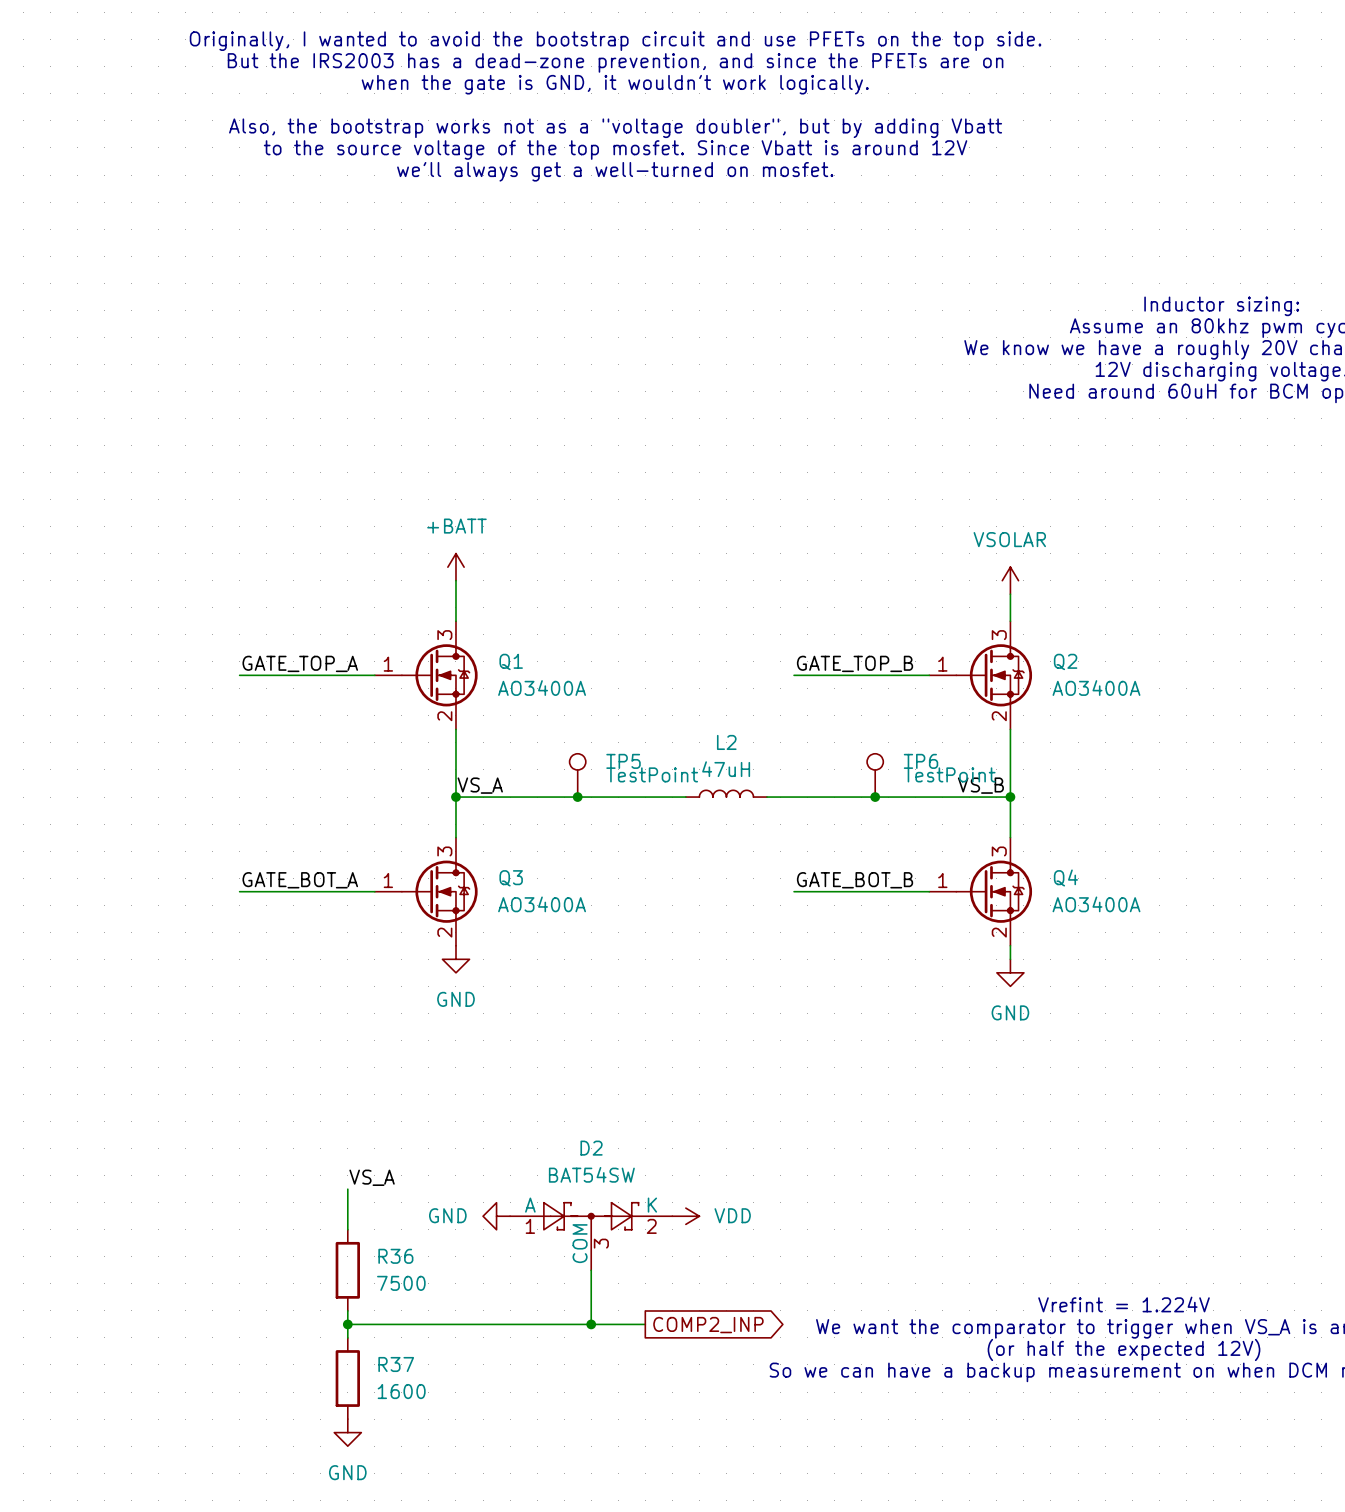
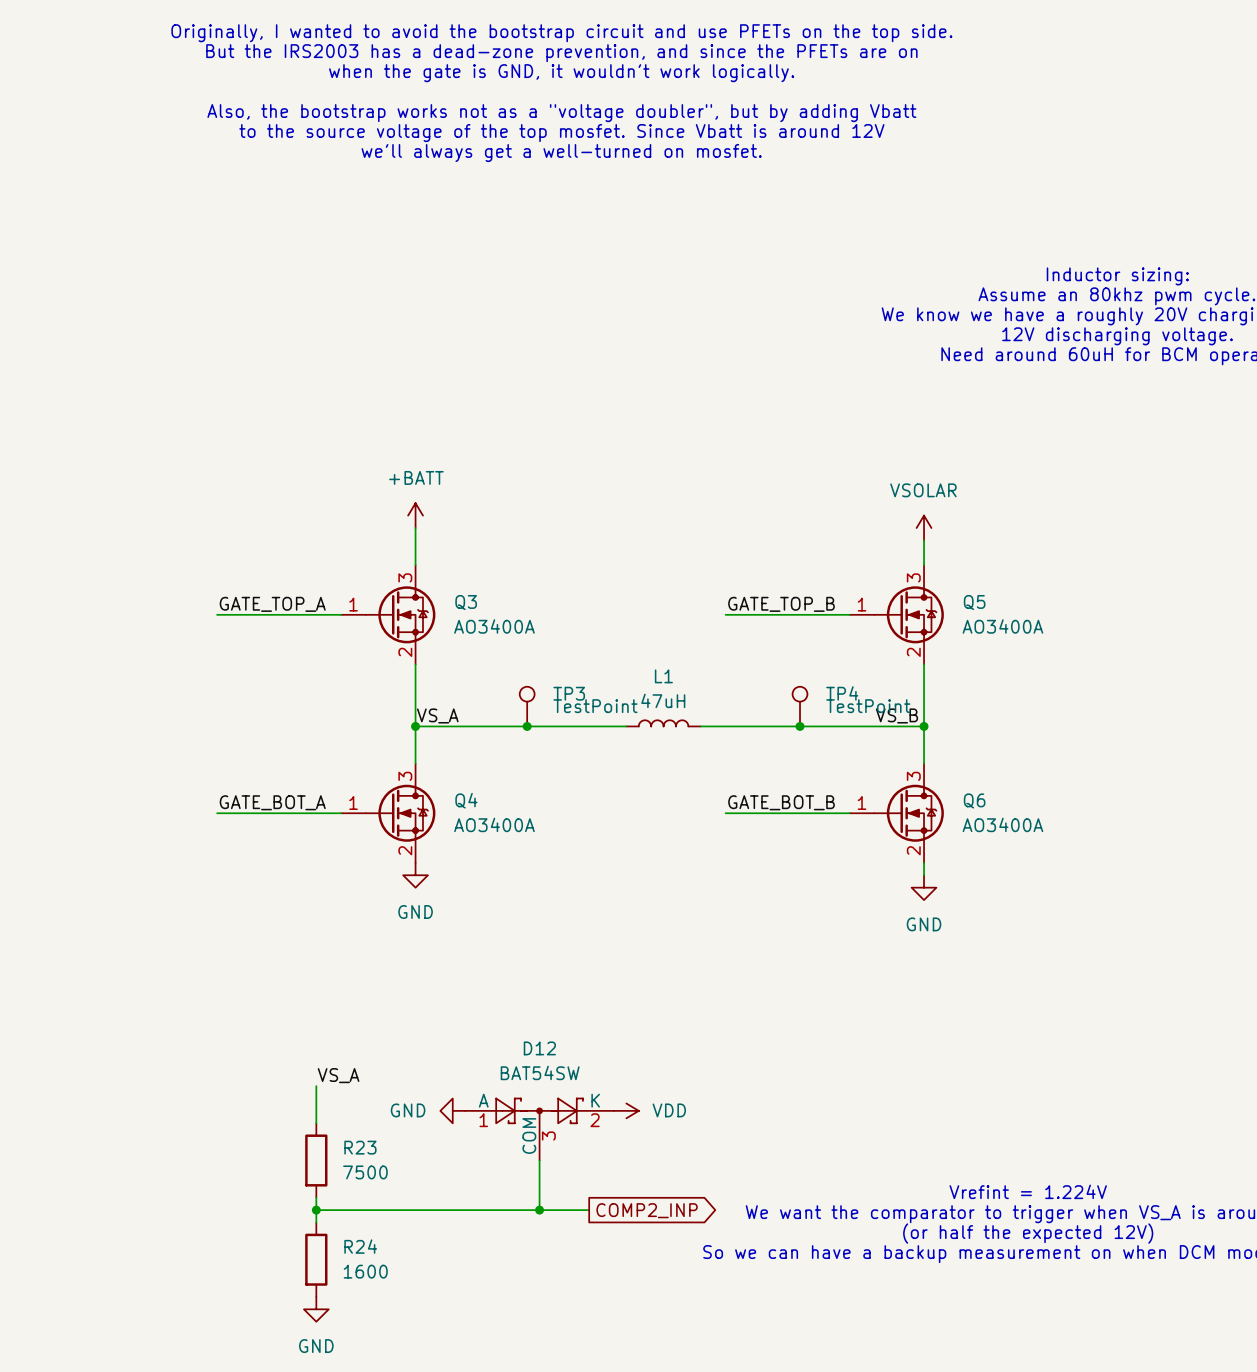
Q1 name: Q1 (511, 661) -> Q3 (466, 602)
Q2 name: Q2 (1065, 661) -> Q5 (974, 602)
L2 name: L2 (726, 742) -> L1 (663, 676)
TP5 name: TP5 (623, 761) -> TP3 (569, 693)
TP6 name: TP6 (921, 761) -> TP4 (842, 693)
Q4 name: Q4 (1065, 877) -> Q6 (974, 800)
Q3 name: Q3 (511, 878) -> Q4 (466, 800)
D2 name: D2 (591, 1148) -> D12 (539, 1048)
R36 name: R36 (395, 1256) -> R23 (360, 1147)
R37 name: R37 (396, 1364) -> R24 (360, 1246)

